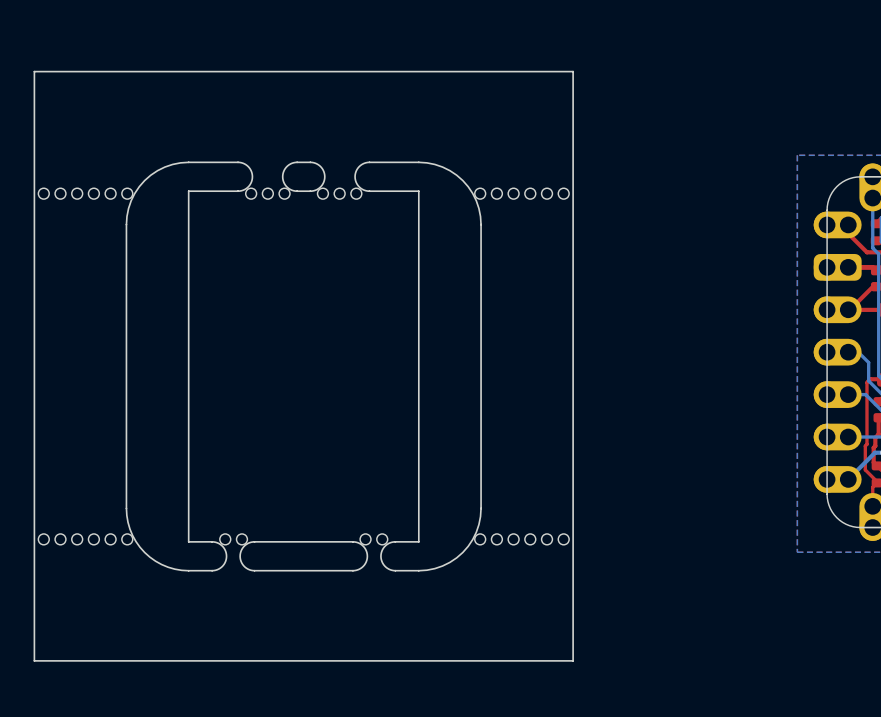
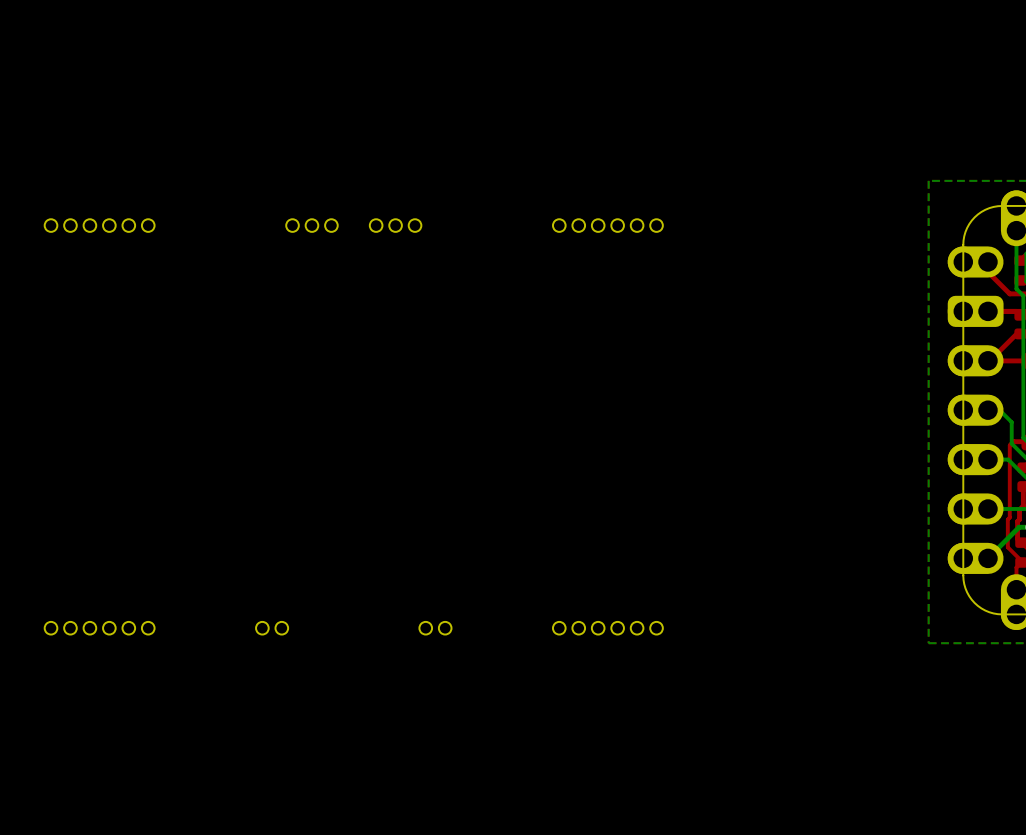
board edge: (573, 71) (34, 71) (34, 660) (573, 660) (573, 71) -> none
board edge: (310, 162) (293, 162) (286, 167) (282, 178) (287, 187) (295, 191) (310, 191) (321, 186) (324, 178) (323, 171) (318, 164) (310, 162) -> none
board edge: (352, 541) (252, 541) (242, 548) (240, 558) (243, 565) (252, 570) (354, 570) (364, 565) (367, 554) (363, 546) (352, 541) -> none
board edge: (188, 570) (217, 569) (224, 564) (226, 556) (224, 548) (217, 542) (188, 541) (188, 191) (244, 189) (250, 183) (252, 175) (248, 167) (239, 162) (188, 162) (164, 167) (150, 175) (139, 186) (131, 200) (126, 216) (126, 508) (128, 522) (135, 541) (149, 557) (168, 567) (188, 570) -> none
board edge: (418, 570) (390, 569) (383, 564) (380, 556) (383, 548) (390, 542) (418, 541) (418, 191) (369, 191) (362, 189) (356, 183) (355, 174) (359, 166) (367, 162) (418, 162) (442, 167) (456, 175) (468, 186) (476, 200) (480, 216) (480, 516) (476, 532) (462, 552) (442, 565) (418, 570) -> none

